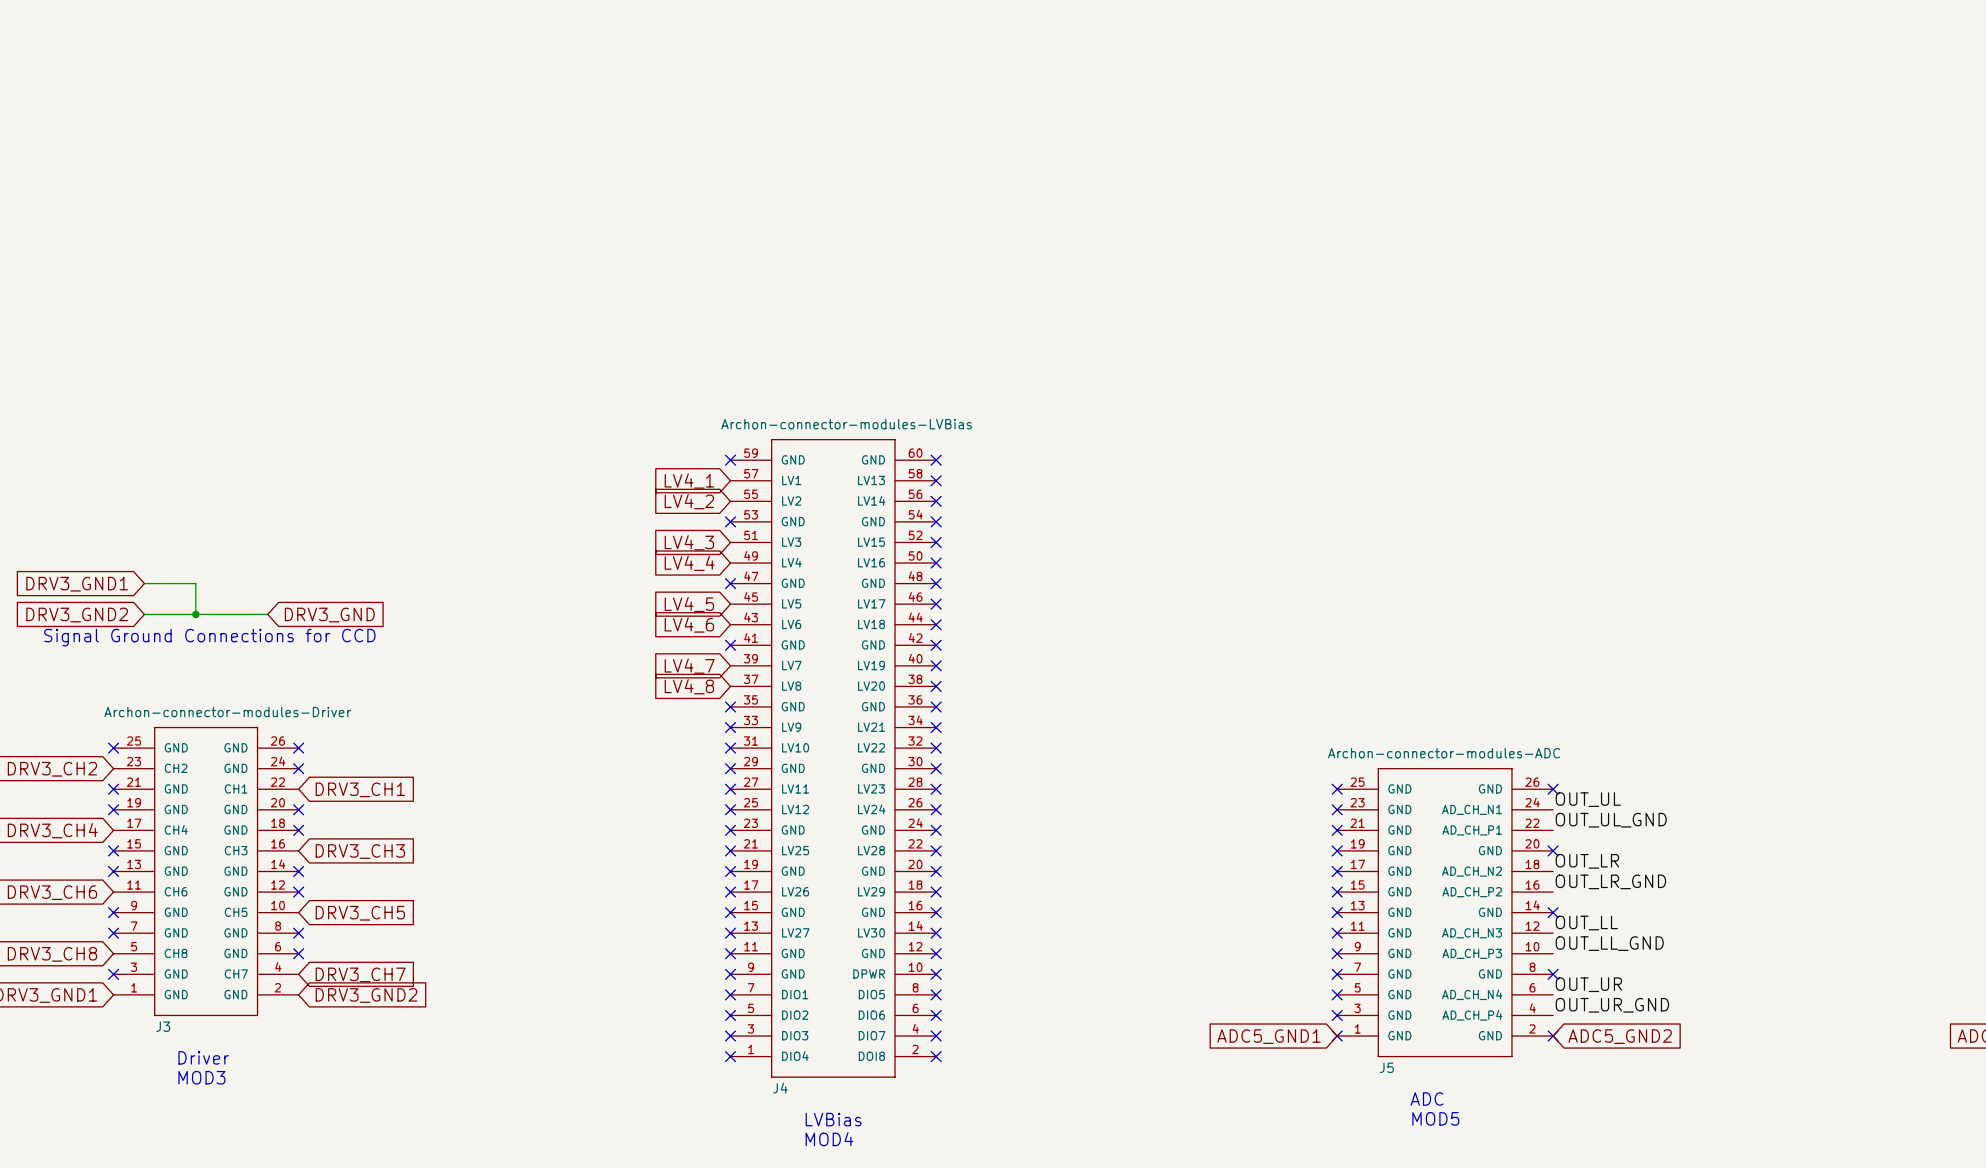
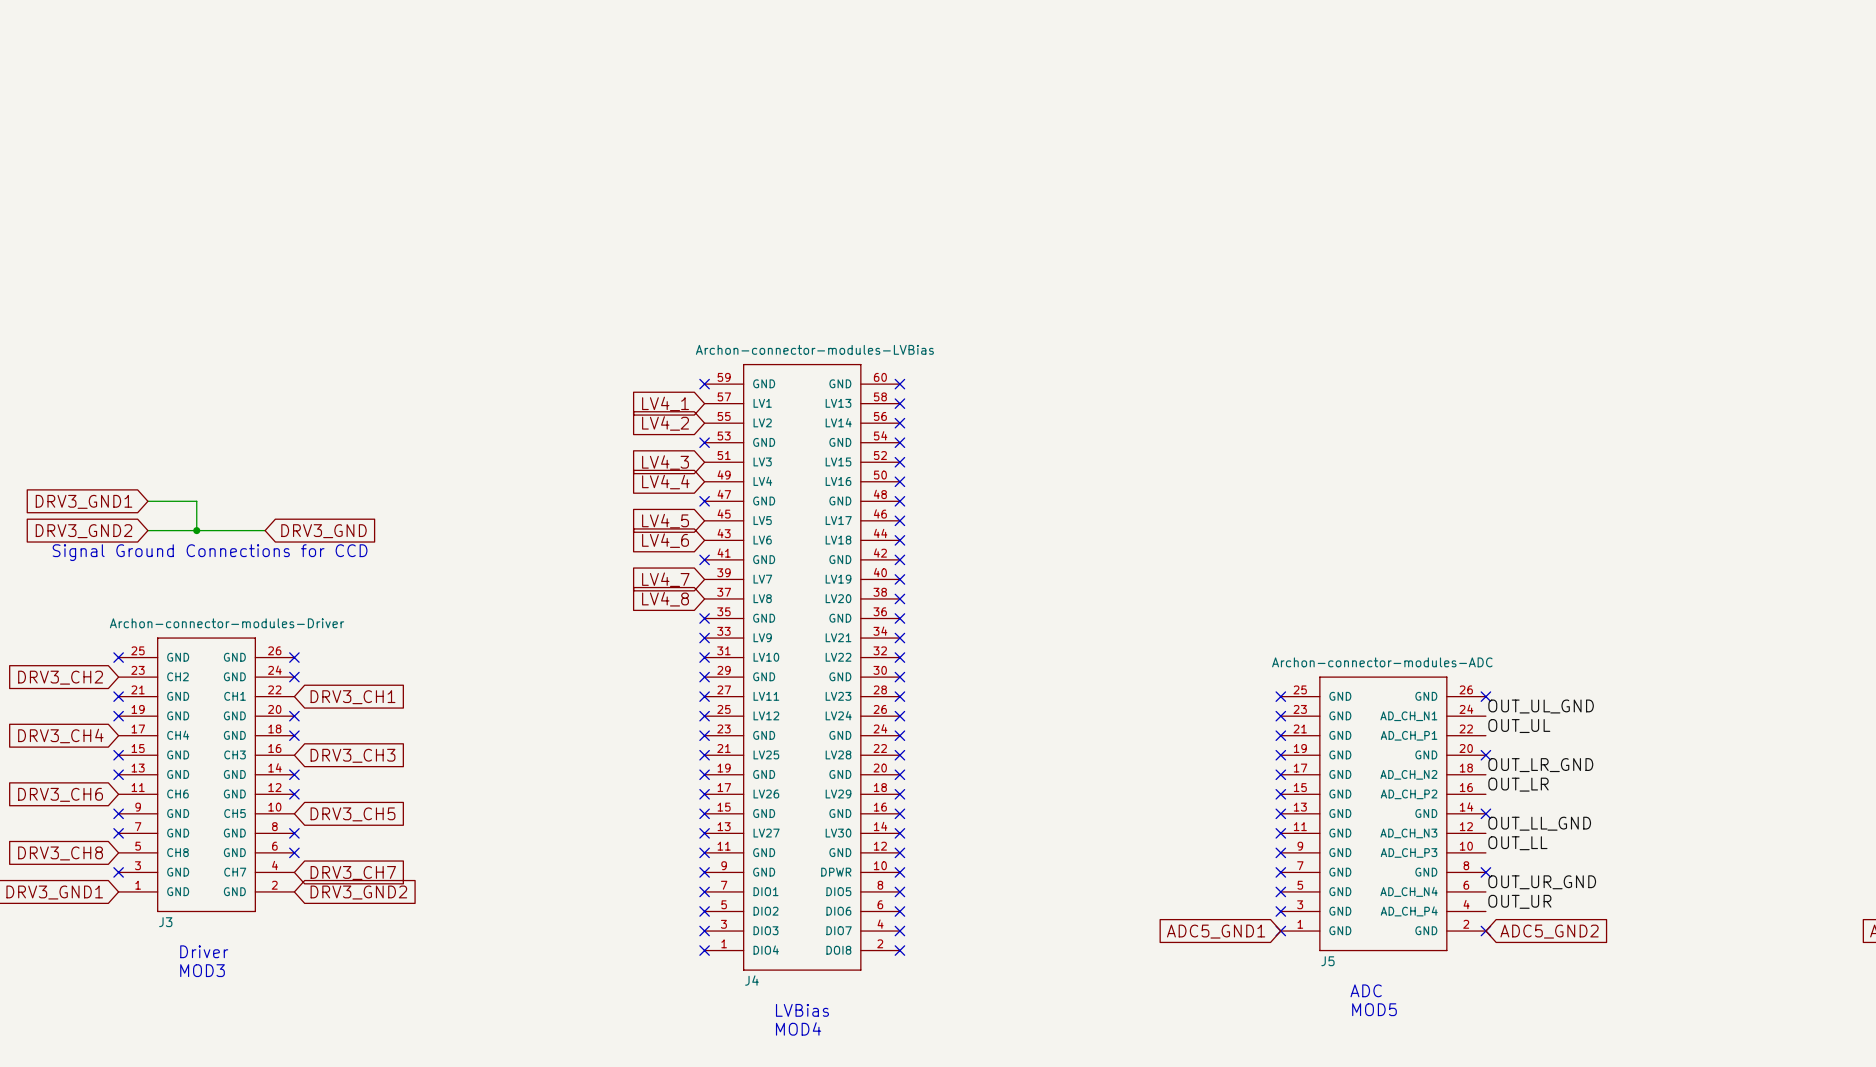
label: OUT_UL (1588, 799) -> OUT_UL_GND (1541, 706)
label: OUT_UL_GND (1611, 820) -> OUT_UL (1519, 726)
label: OUT_LR (1587, 861) -> OUT_LR_GND (1540, 765)
label: OUT_LR_GND (1610, 881) -> OUT_LR (1518, 784)
label: OUT_LL (1586, 923) -> OUT_LL_GND (1539, 823)
label: OUT_LL_GND (1609, 943) -> OUT_LL (1517, 843)
label: OUT_UR (1588, 984) -> OUT_UR_GND (1542, 882)
label: OUT_UR_GND (1612, 1005) -> OUT_UR (1519, 901)

